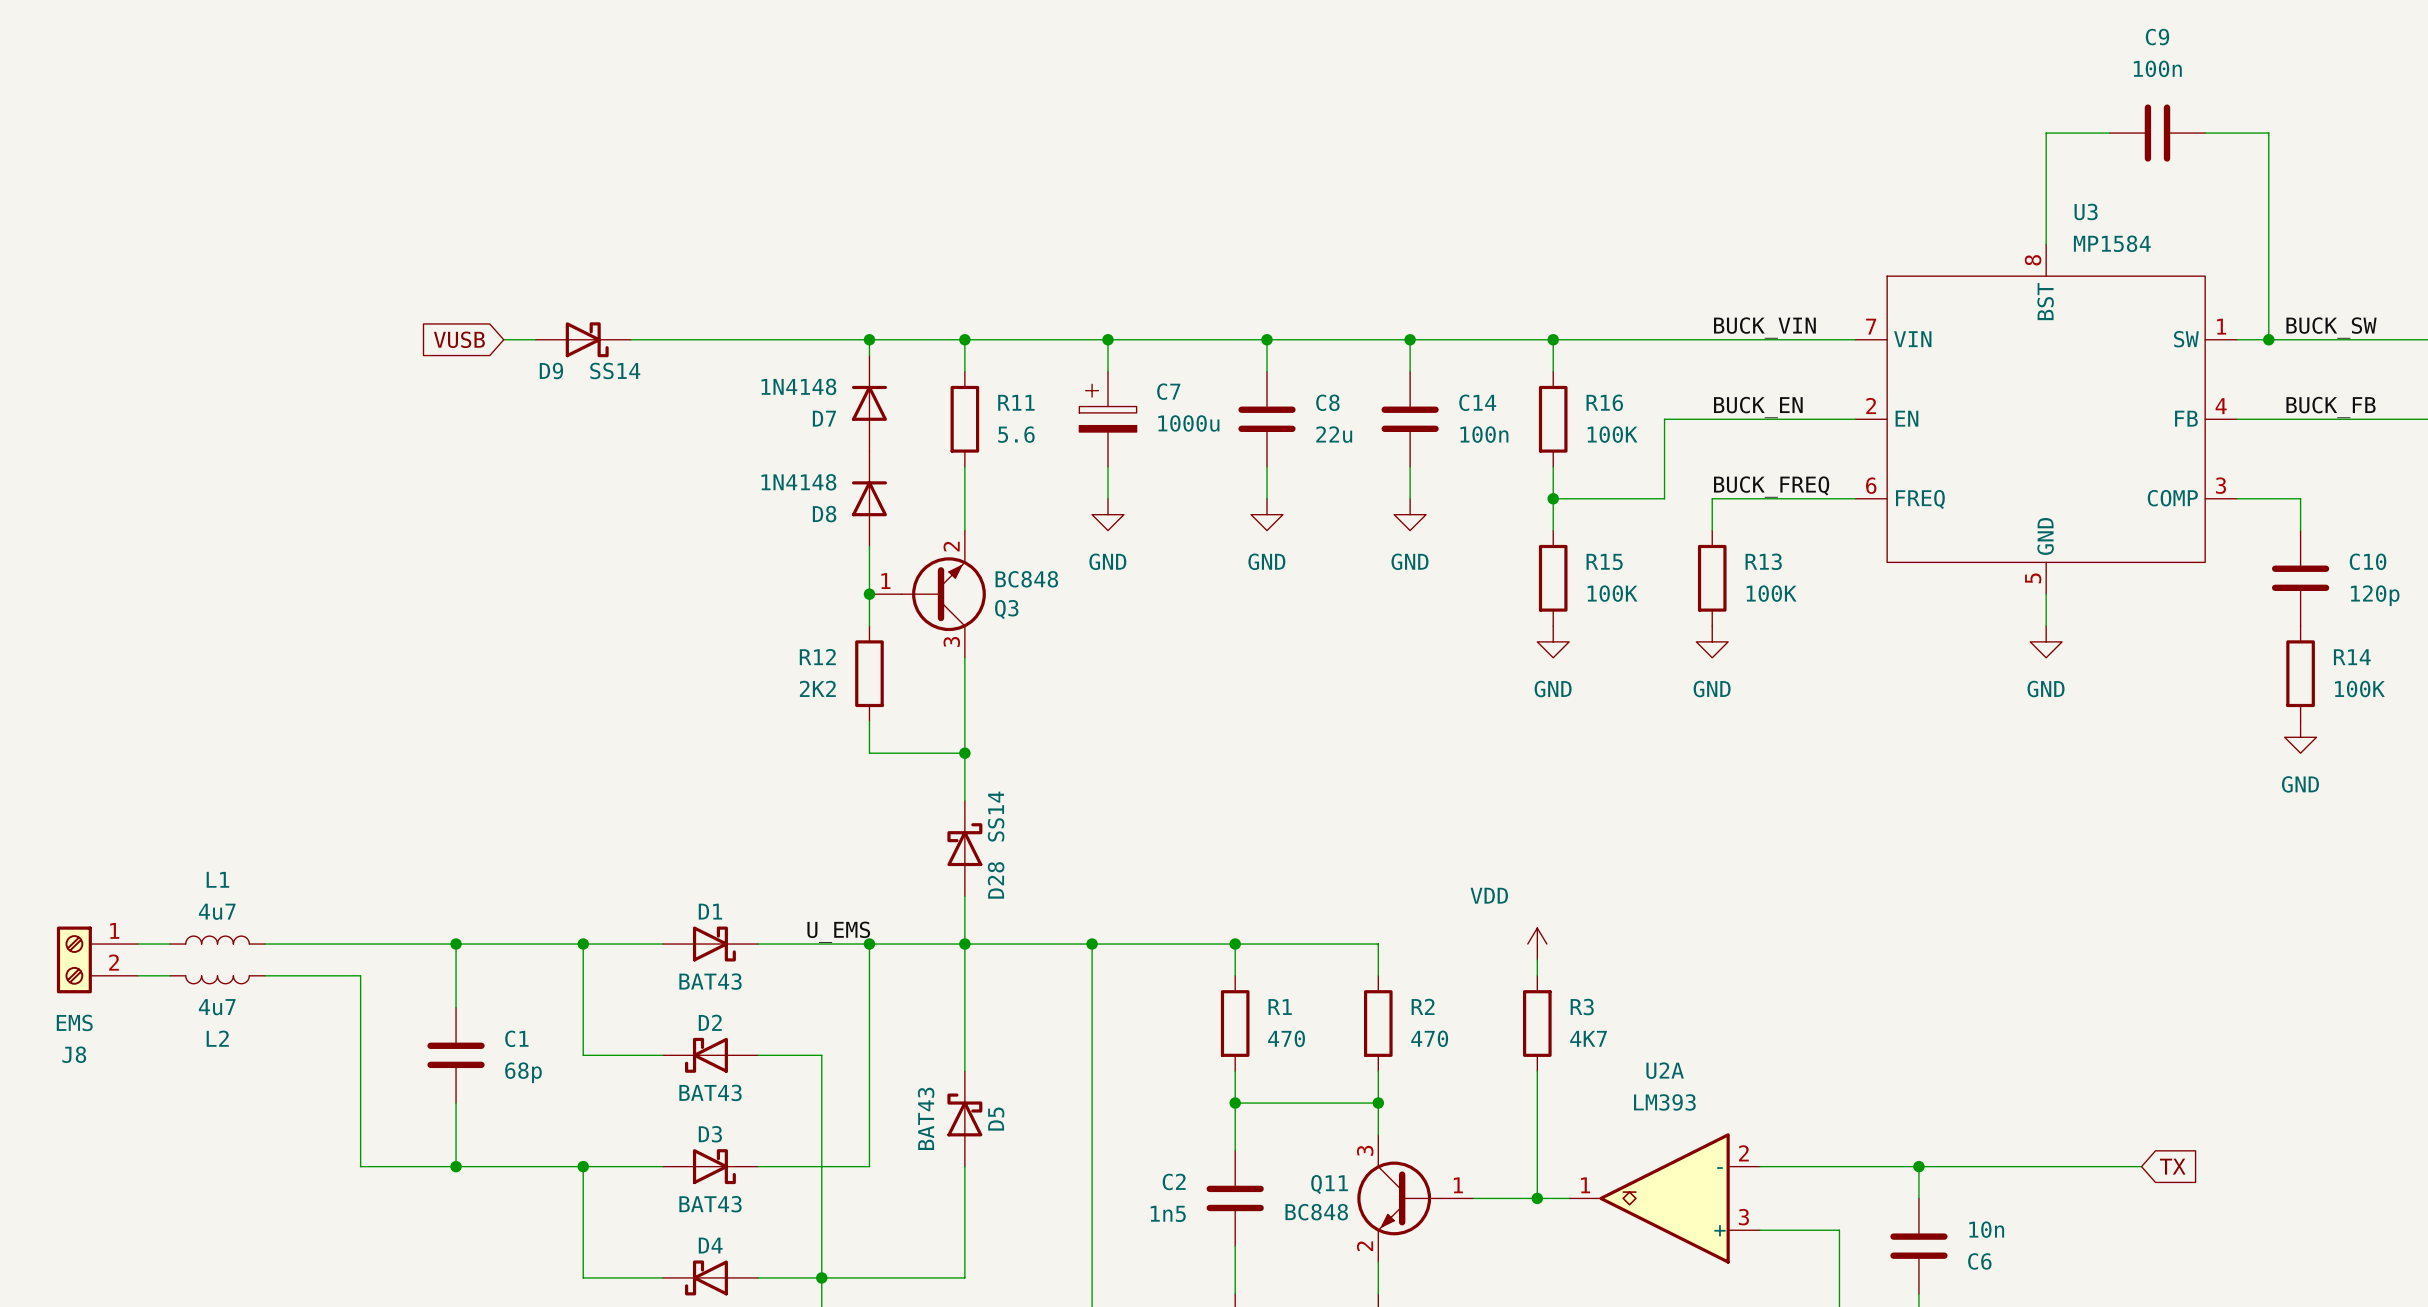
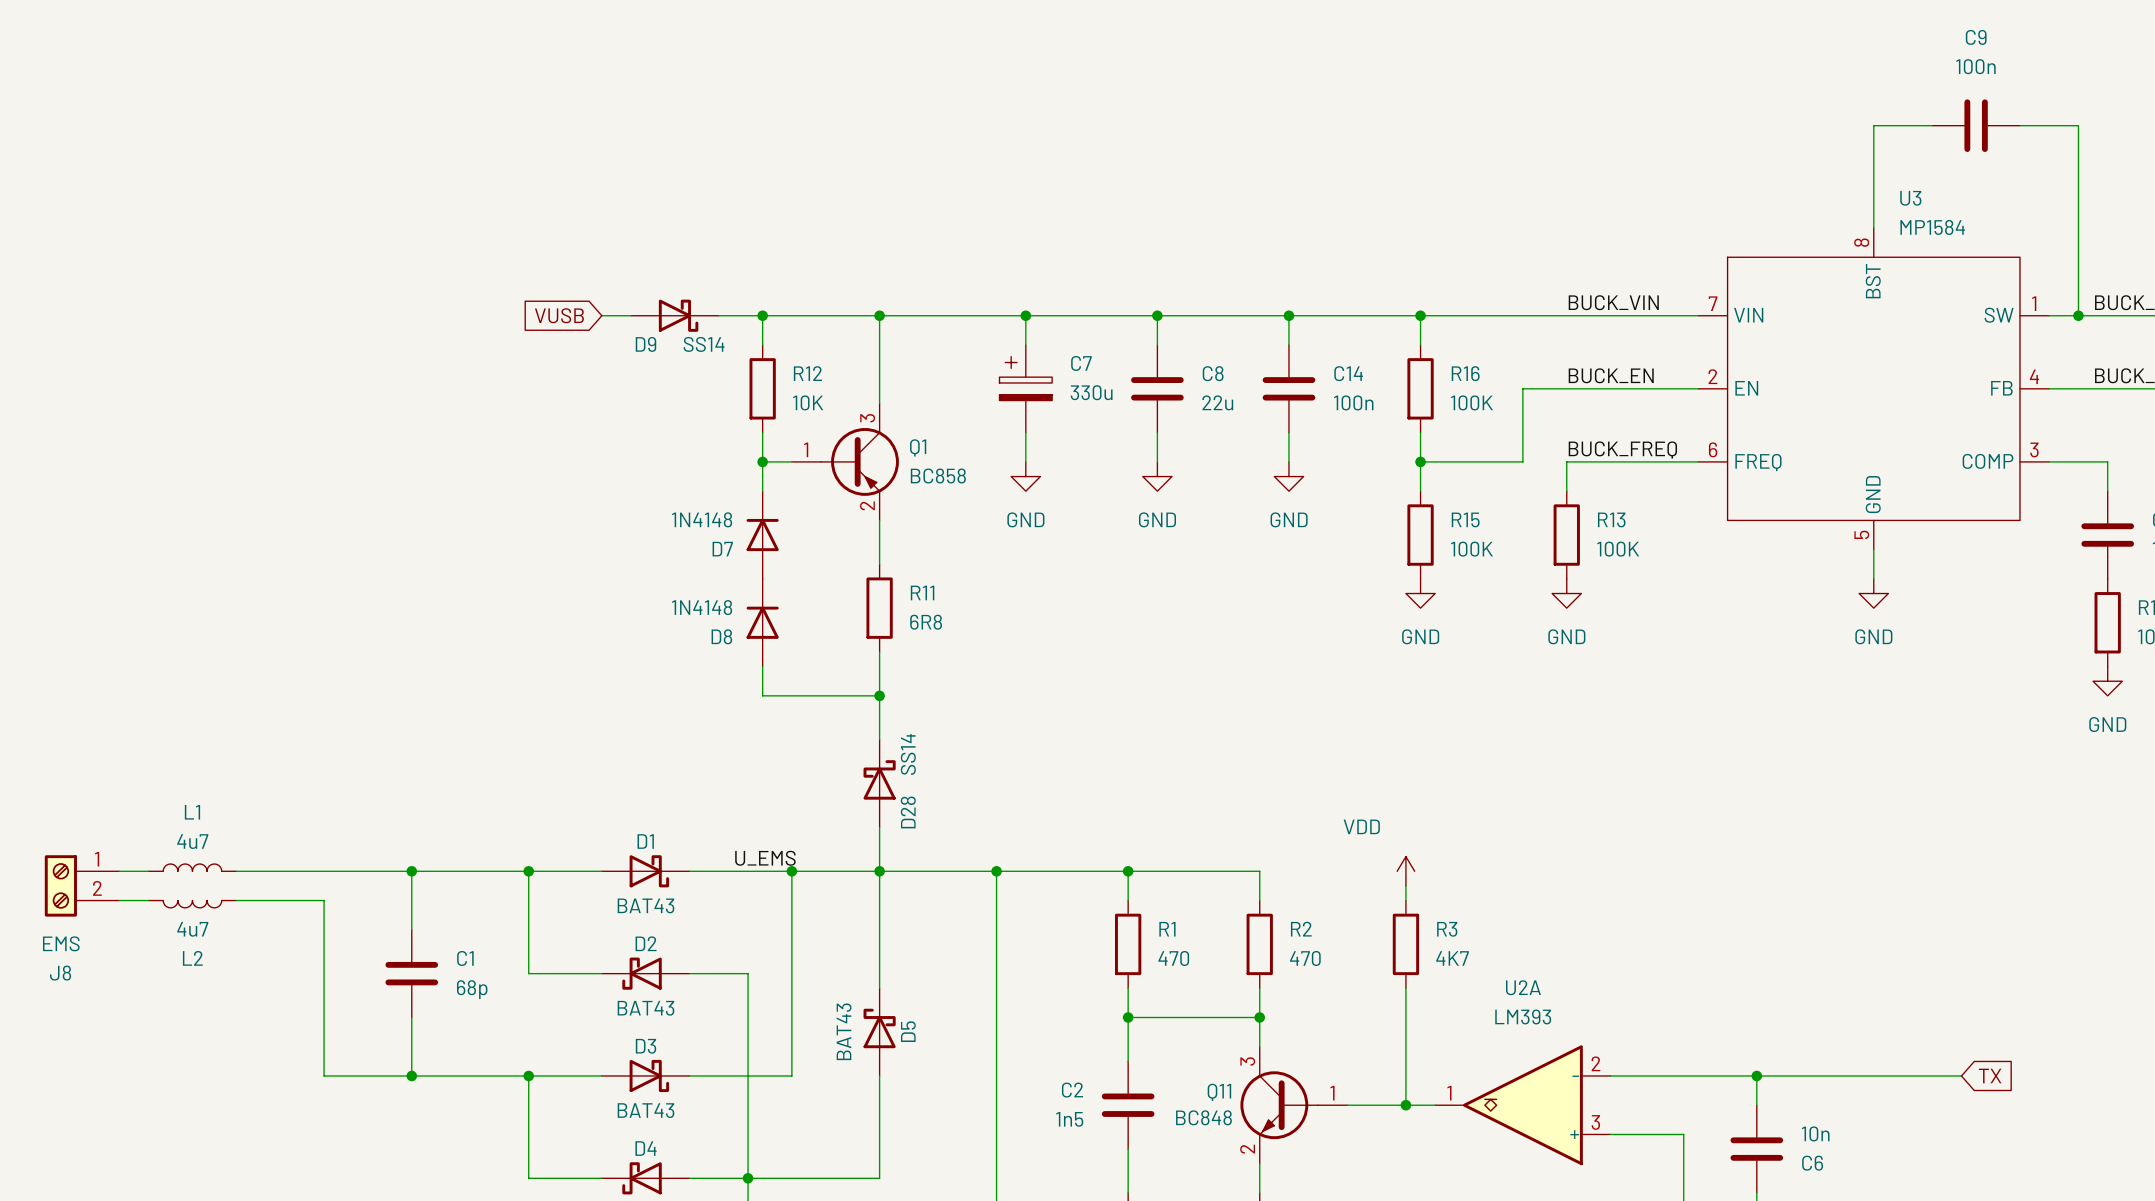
global label position: VUSB (459, 339) -> VUSB (559, 315)
wire: (503, 339) (535, 339) -> none
D9 position: (583, 339) -> (674, 315)
wire: (630, 339) (662, 339) -> (762, 461) (791, 461)
wire: none -> (762, 315) (762, 344)
wire: (869, 339) (869, 355) -> none
junction position: (869, 339) -> (762, 315)
wire: (1107, 339) (1107, 371) -> (1025, 315) (1025, 344)
junction position: (1107, 339) -> (1025, 315)
D7 position: (869, 403) -> (762, 535)
R11 position: (964, 419) -> (879, 608)
C7 position: (1107, 419) -> (1025, 388)
C7 value: 1000u (1188, 423) -> 330u (1091, 392)
R11 value: 5.6 (1016, 434) -> 6R8 (926, 622)
wire: none -> (762, 432) (762, 491)
wire: (964, 466) (964, 530) -> (879, 344) (879, 403)
wire: (1107, 466) (1107, 498) -> (1025, 432) (1025, 461)
junction: none -> (762, 461)
D8 position: (869, 498) -> (762, 622)
Q1: none -> BC858 (845, 461)
power symbol position: GND (1107, 514) -> GND (1025, 476)
wire: (869, 546) (869, 625) -> none
junction: (869, 594) -> none
Q3: BC848 (927, 594) -> none
R12 name position: R12 (817, 657) -> R12 (807, 373)
wire: (964, 657) (964, 705) -> (879, 520) (879, 564)
R12 position: (869, 673) -> (762, 388)
R12 value: 2K2 (817, 688) -> 10K (808, 402)
wire: (869, 721) (869, 753) -> (762, 666) (762, 695) (791, 695)

